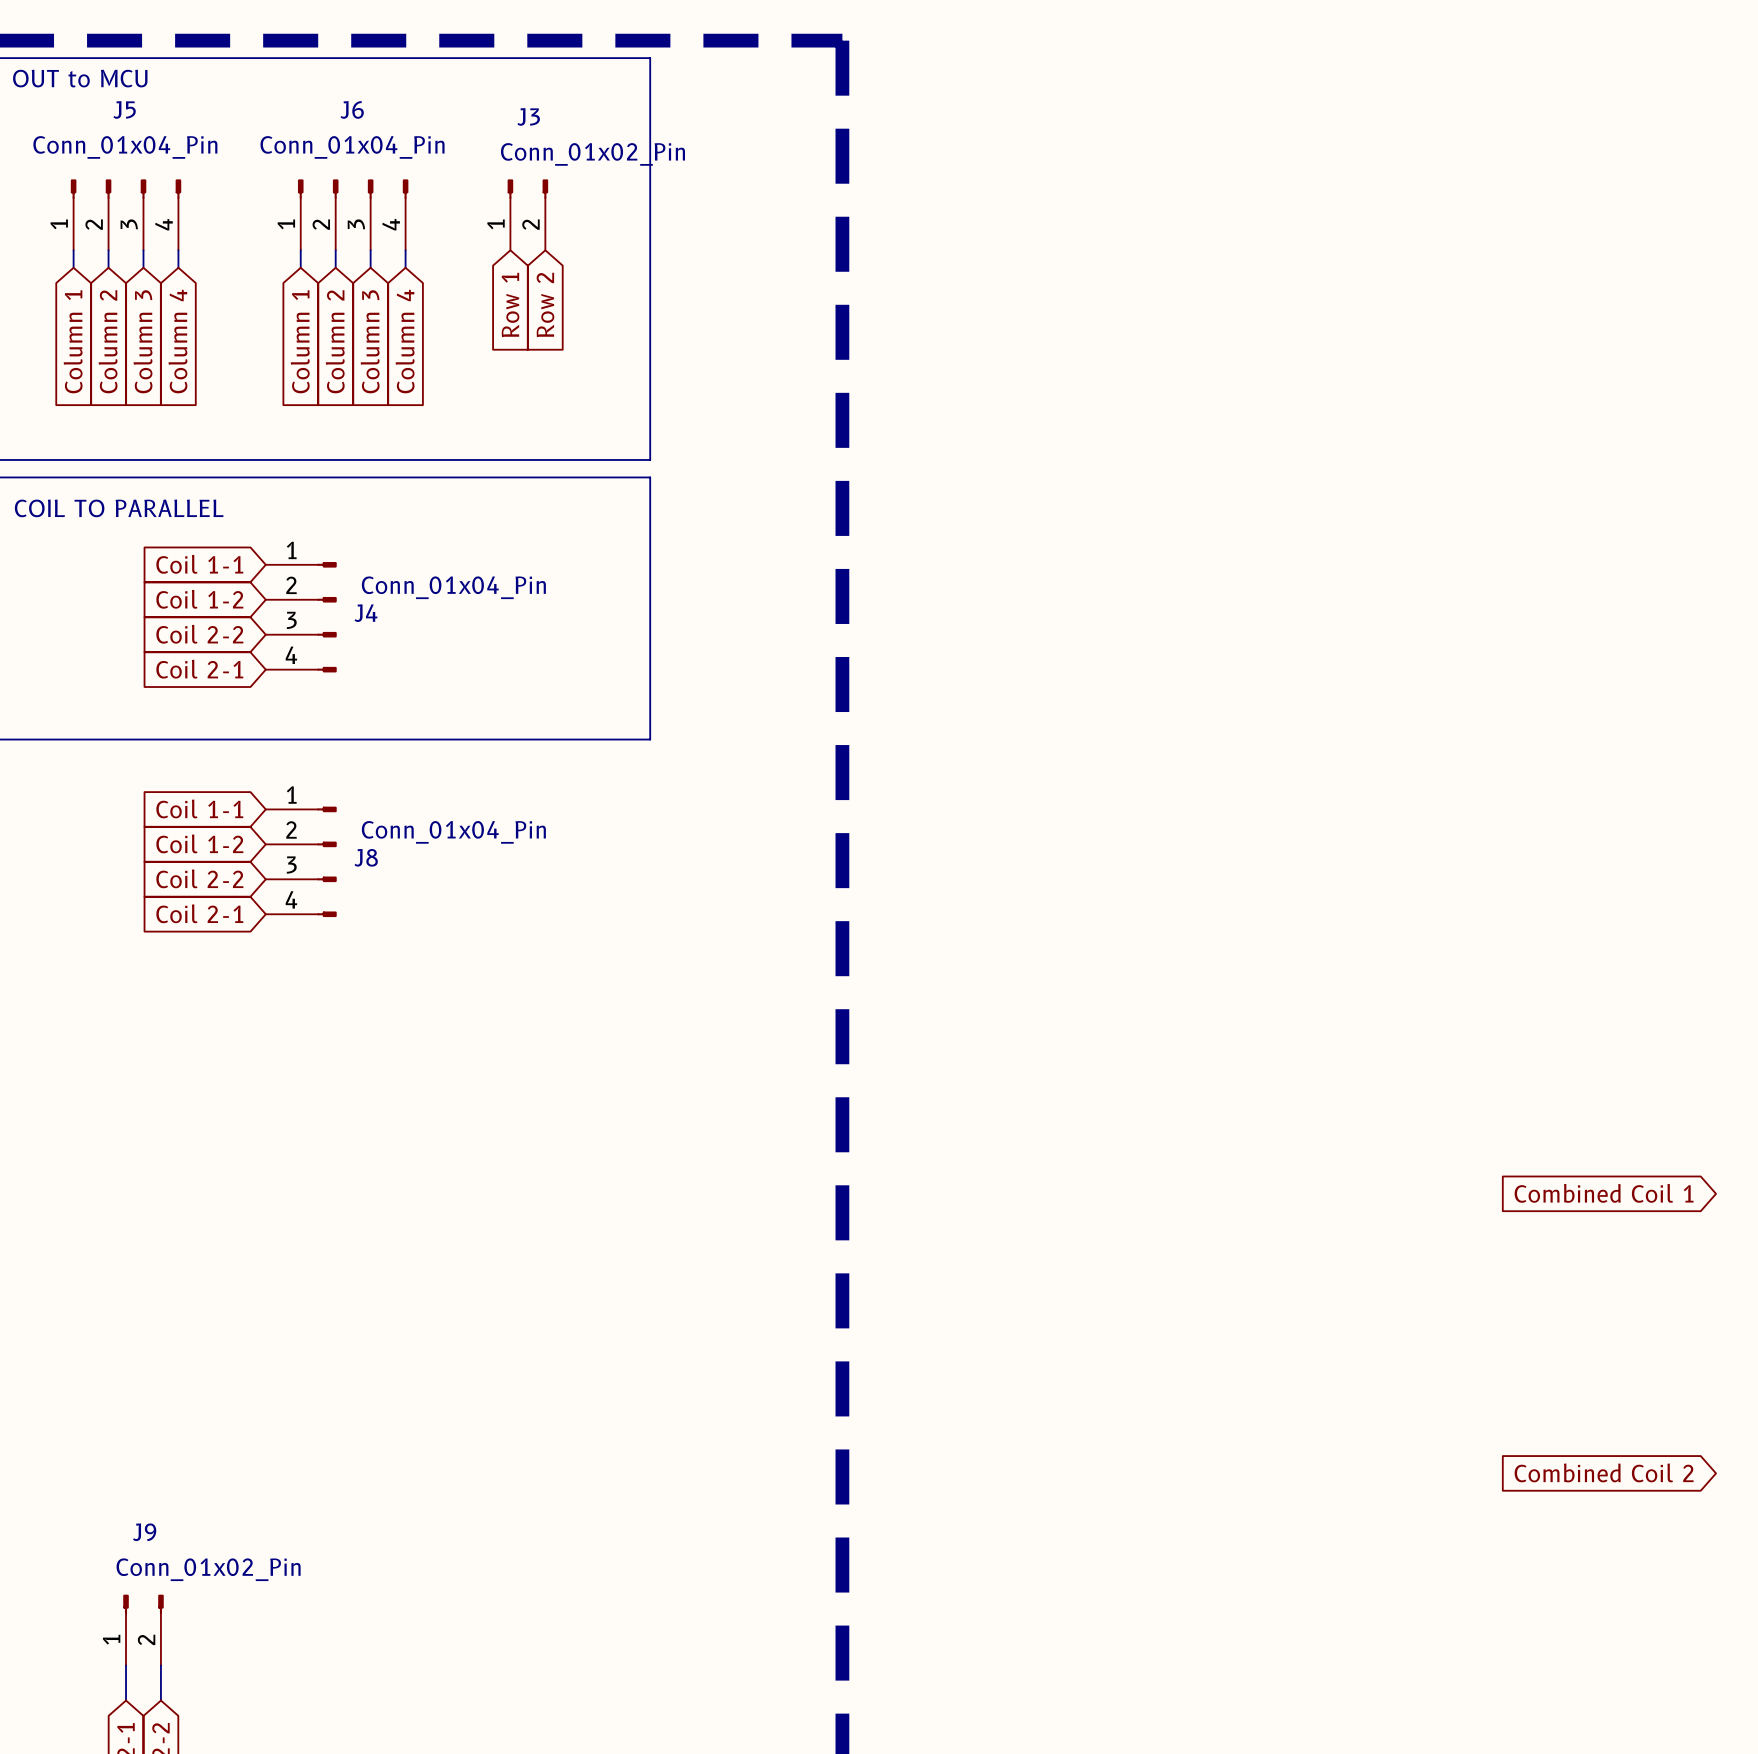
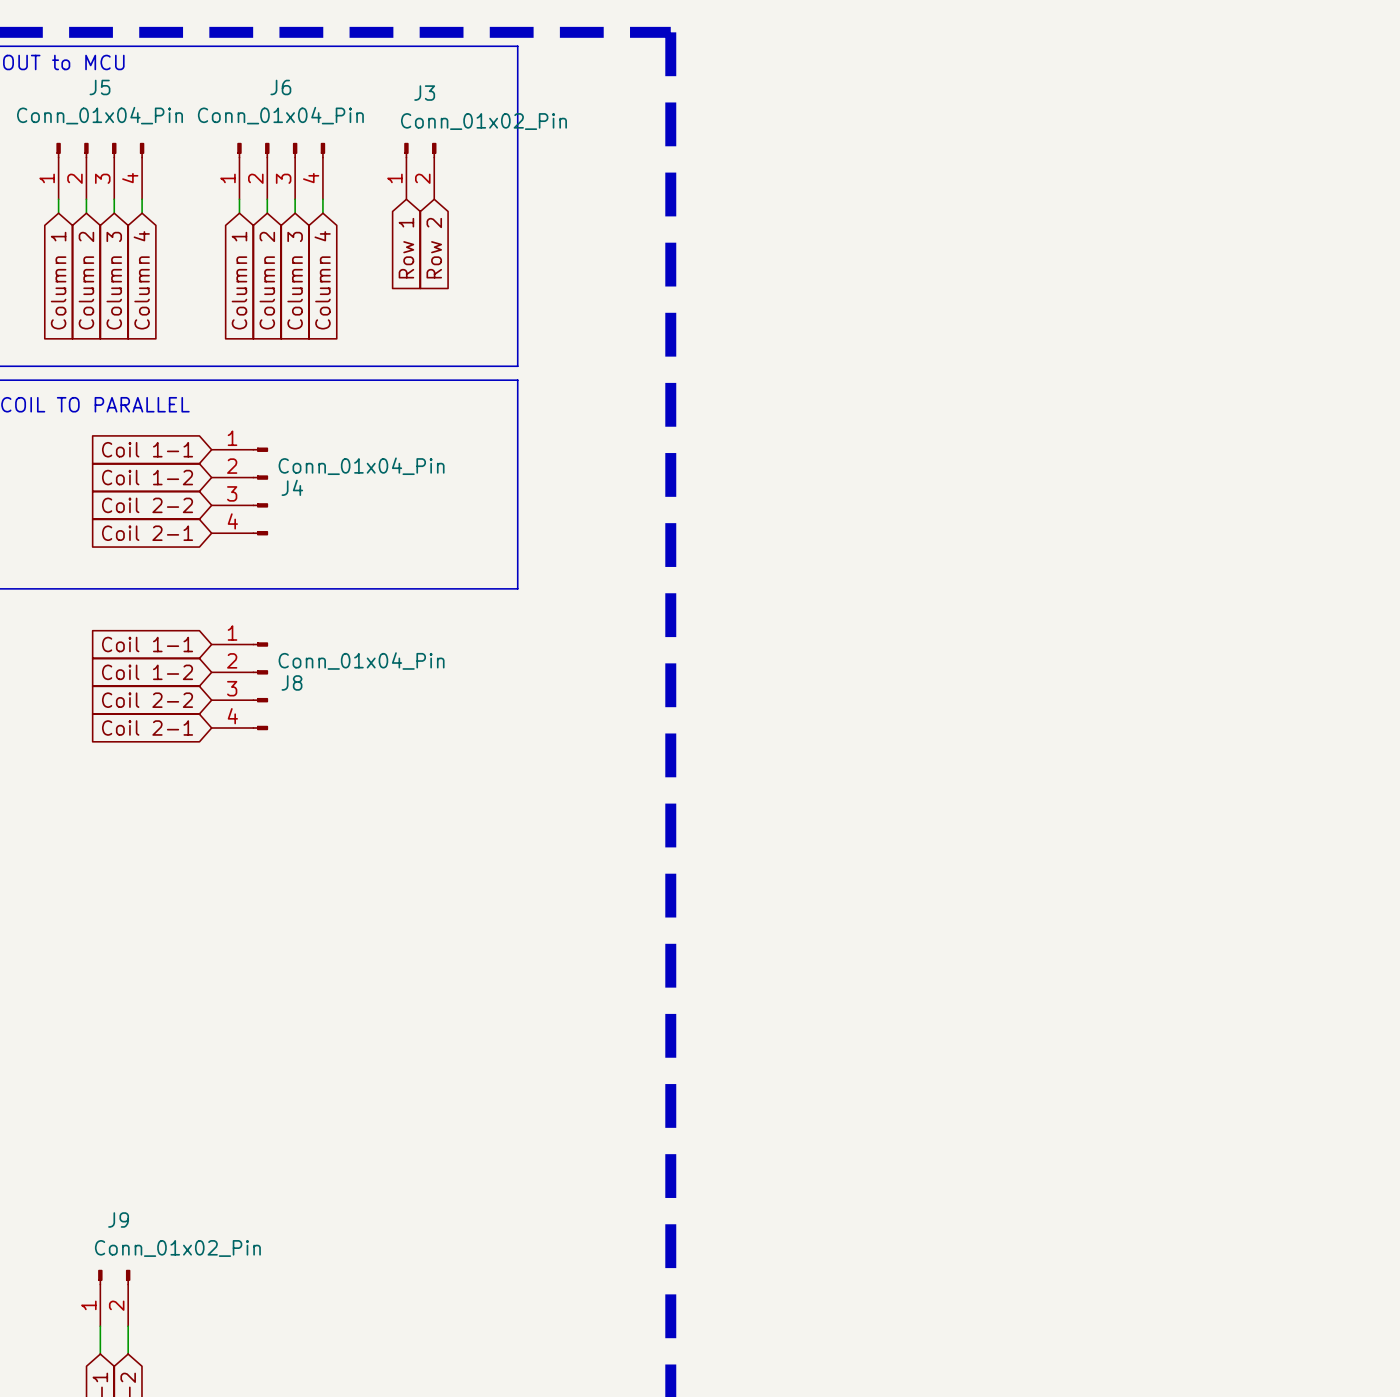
global label: Combined Coil 1 (1604, 1193) -> none
global label: Combined Coil 2 (1604, 1472) -> none

